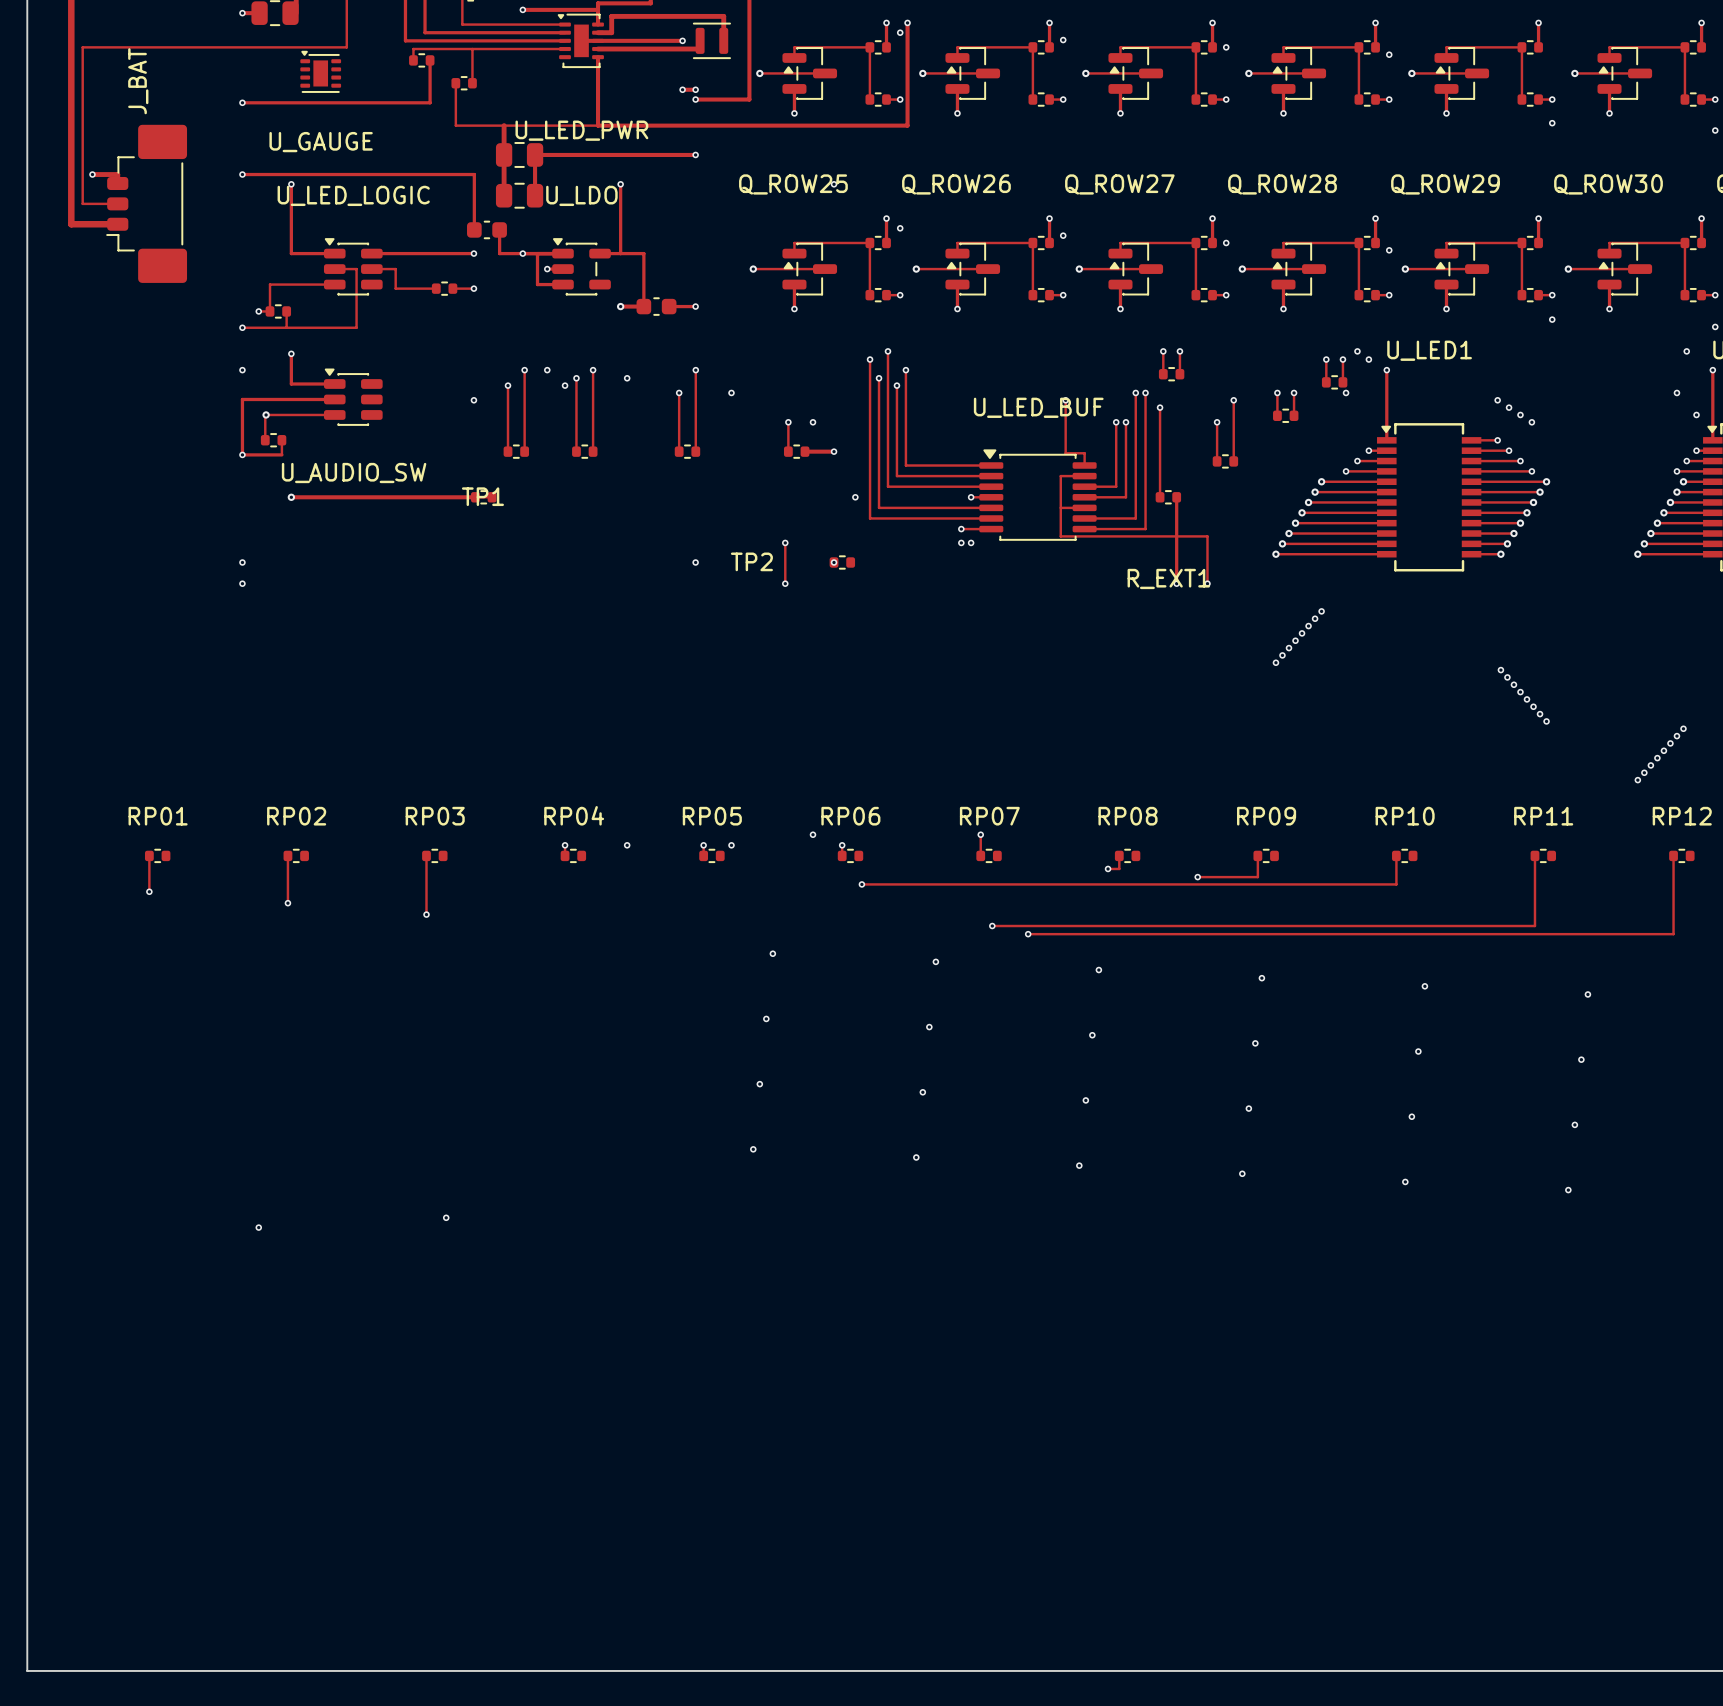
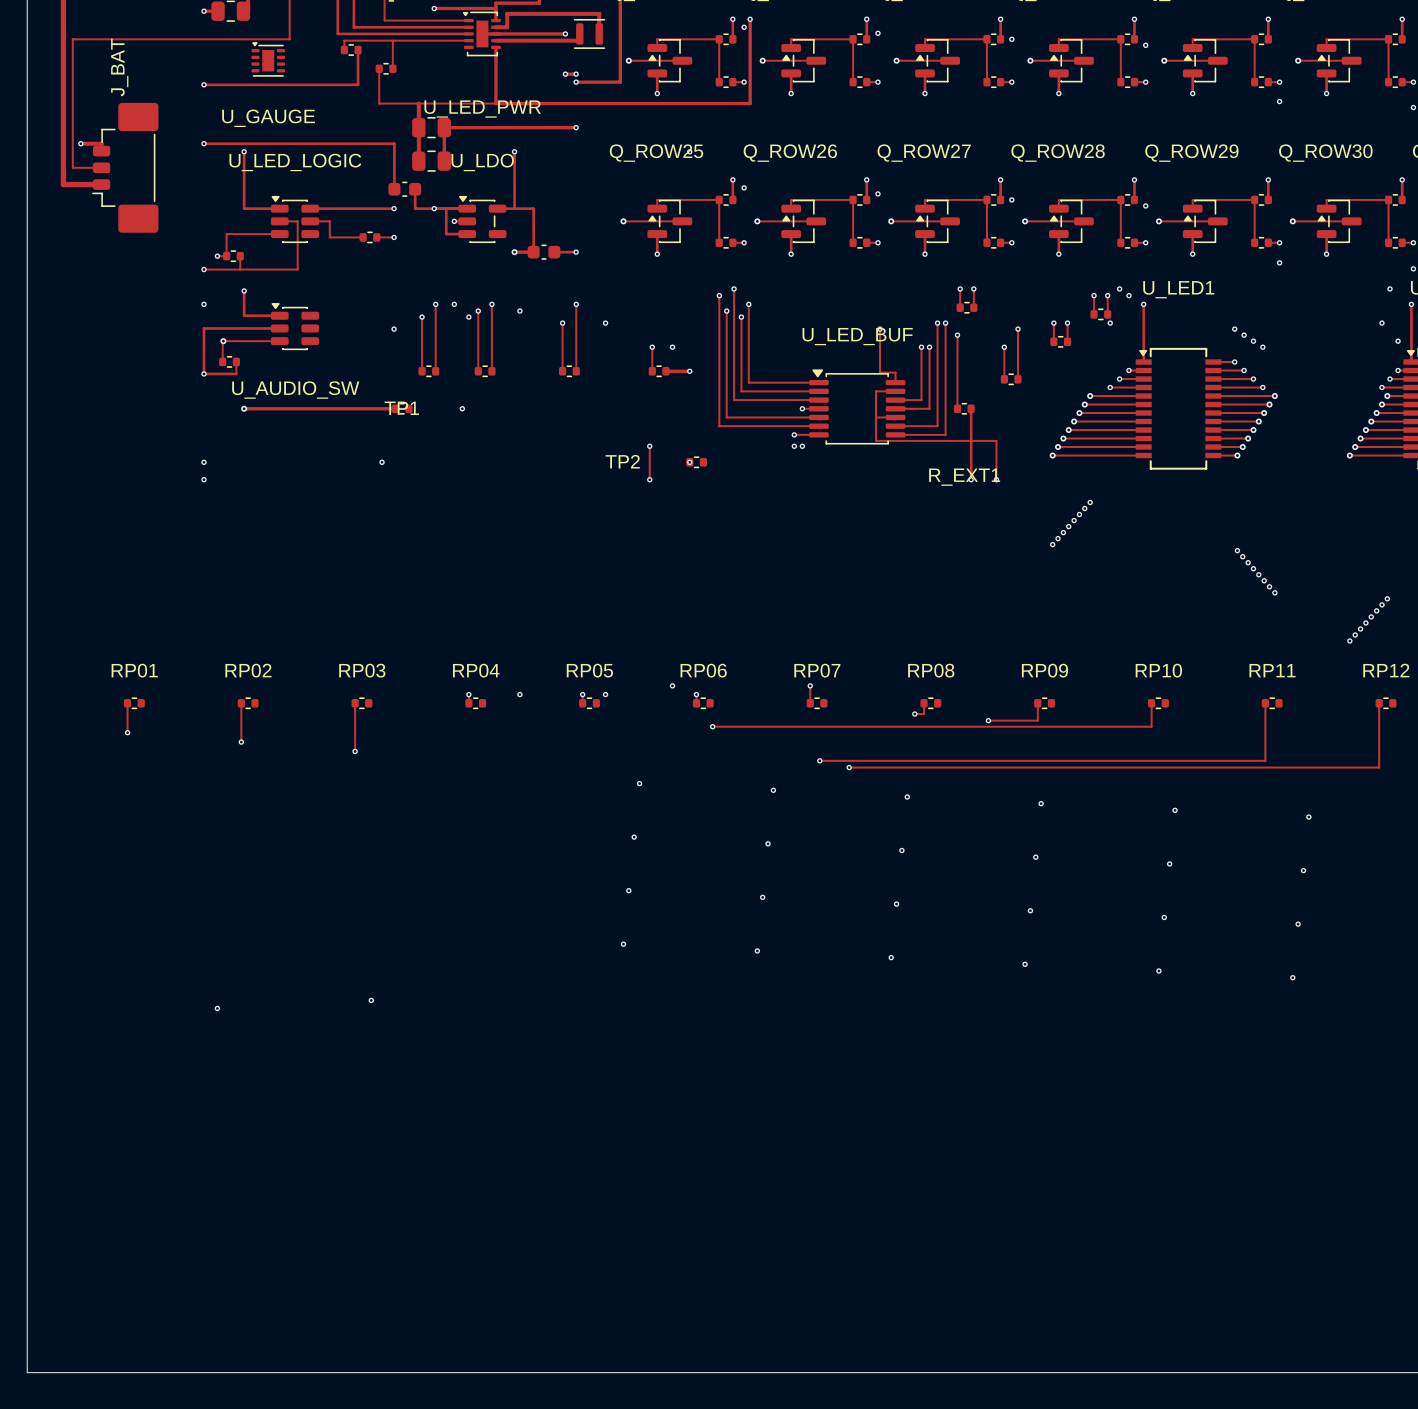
via: none -> (462, 408)
via: (855, 497) -> none
via: none -> (382, 462)
via: (695, 562) -> none

